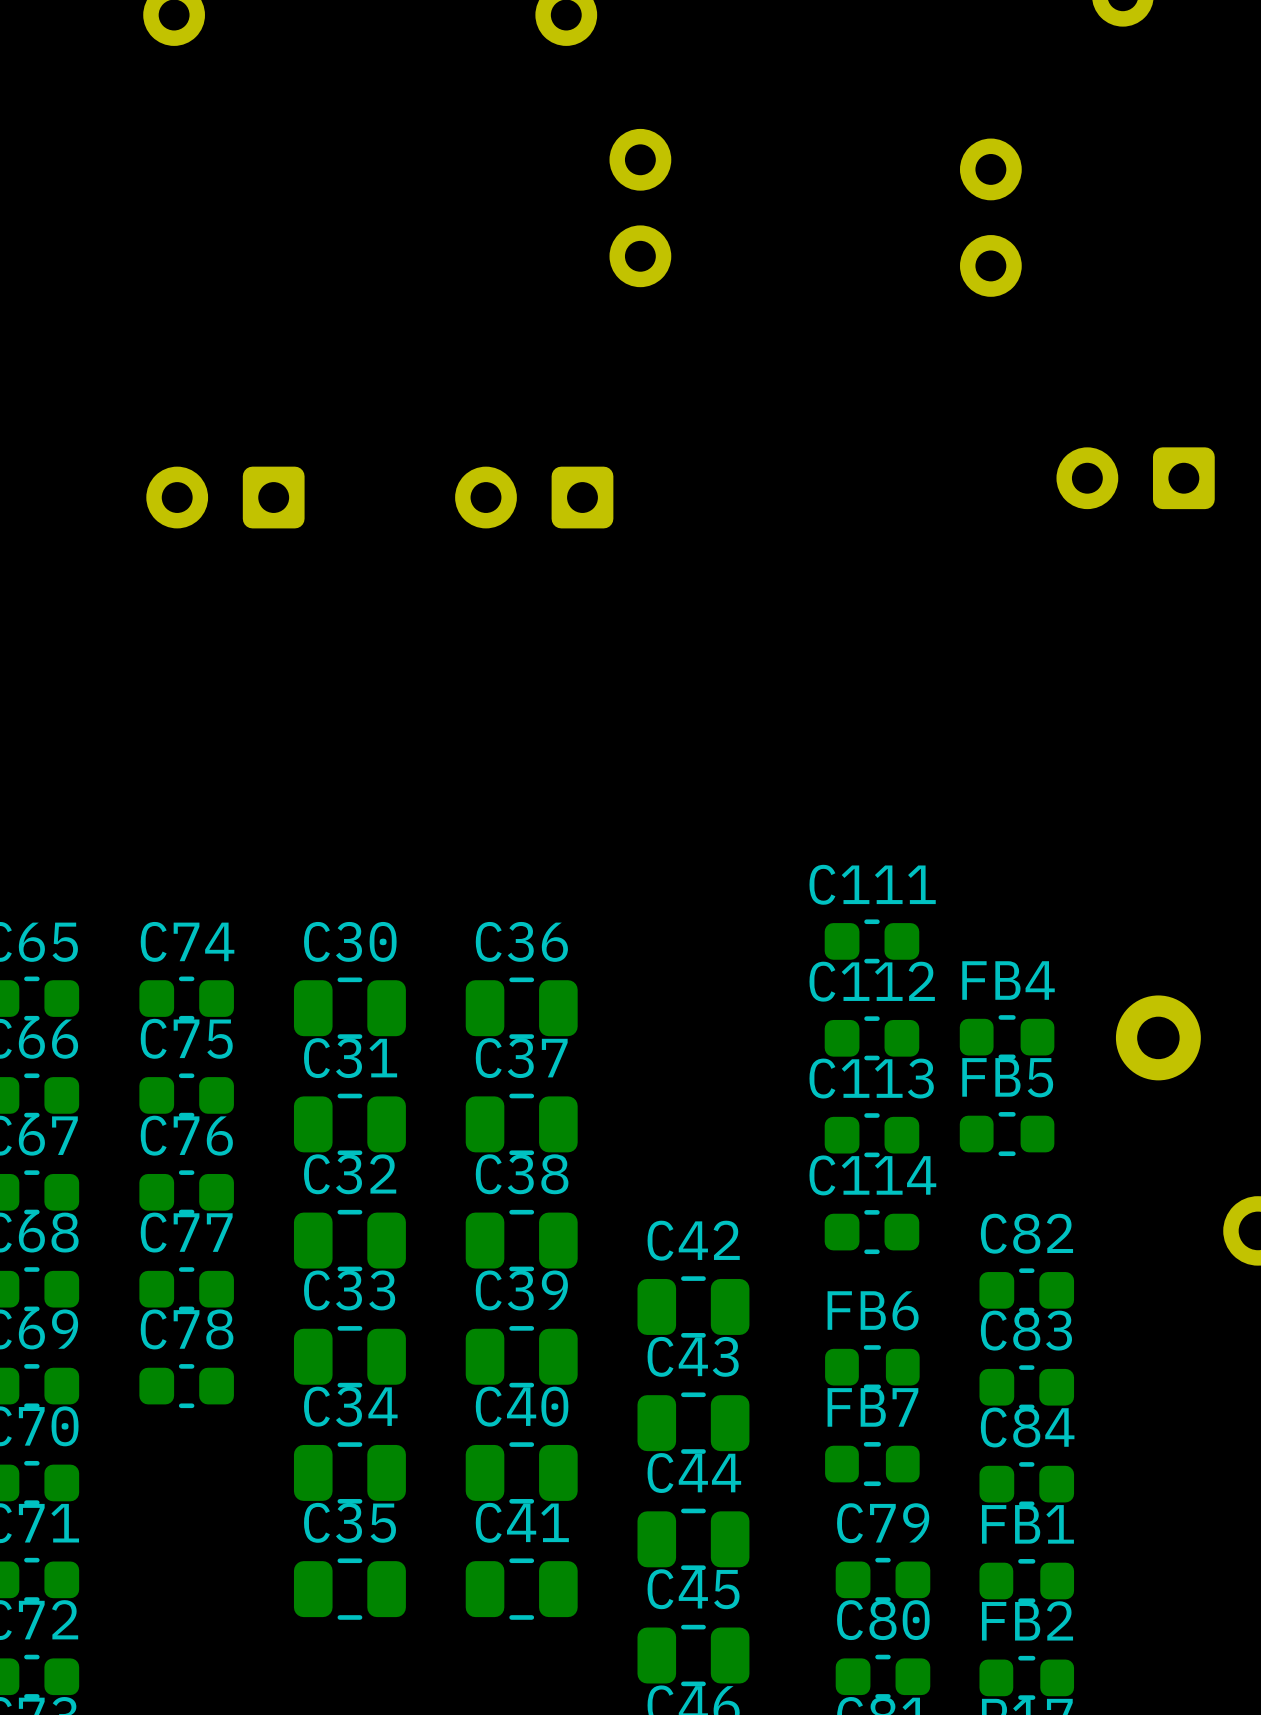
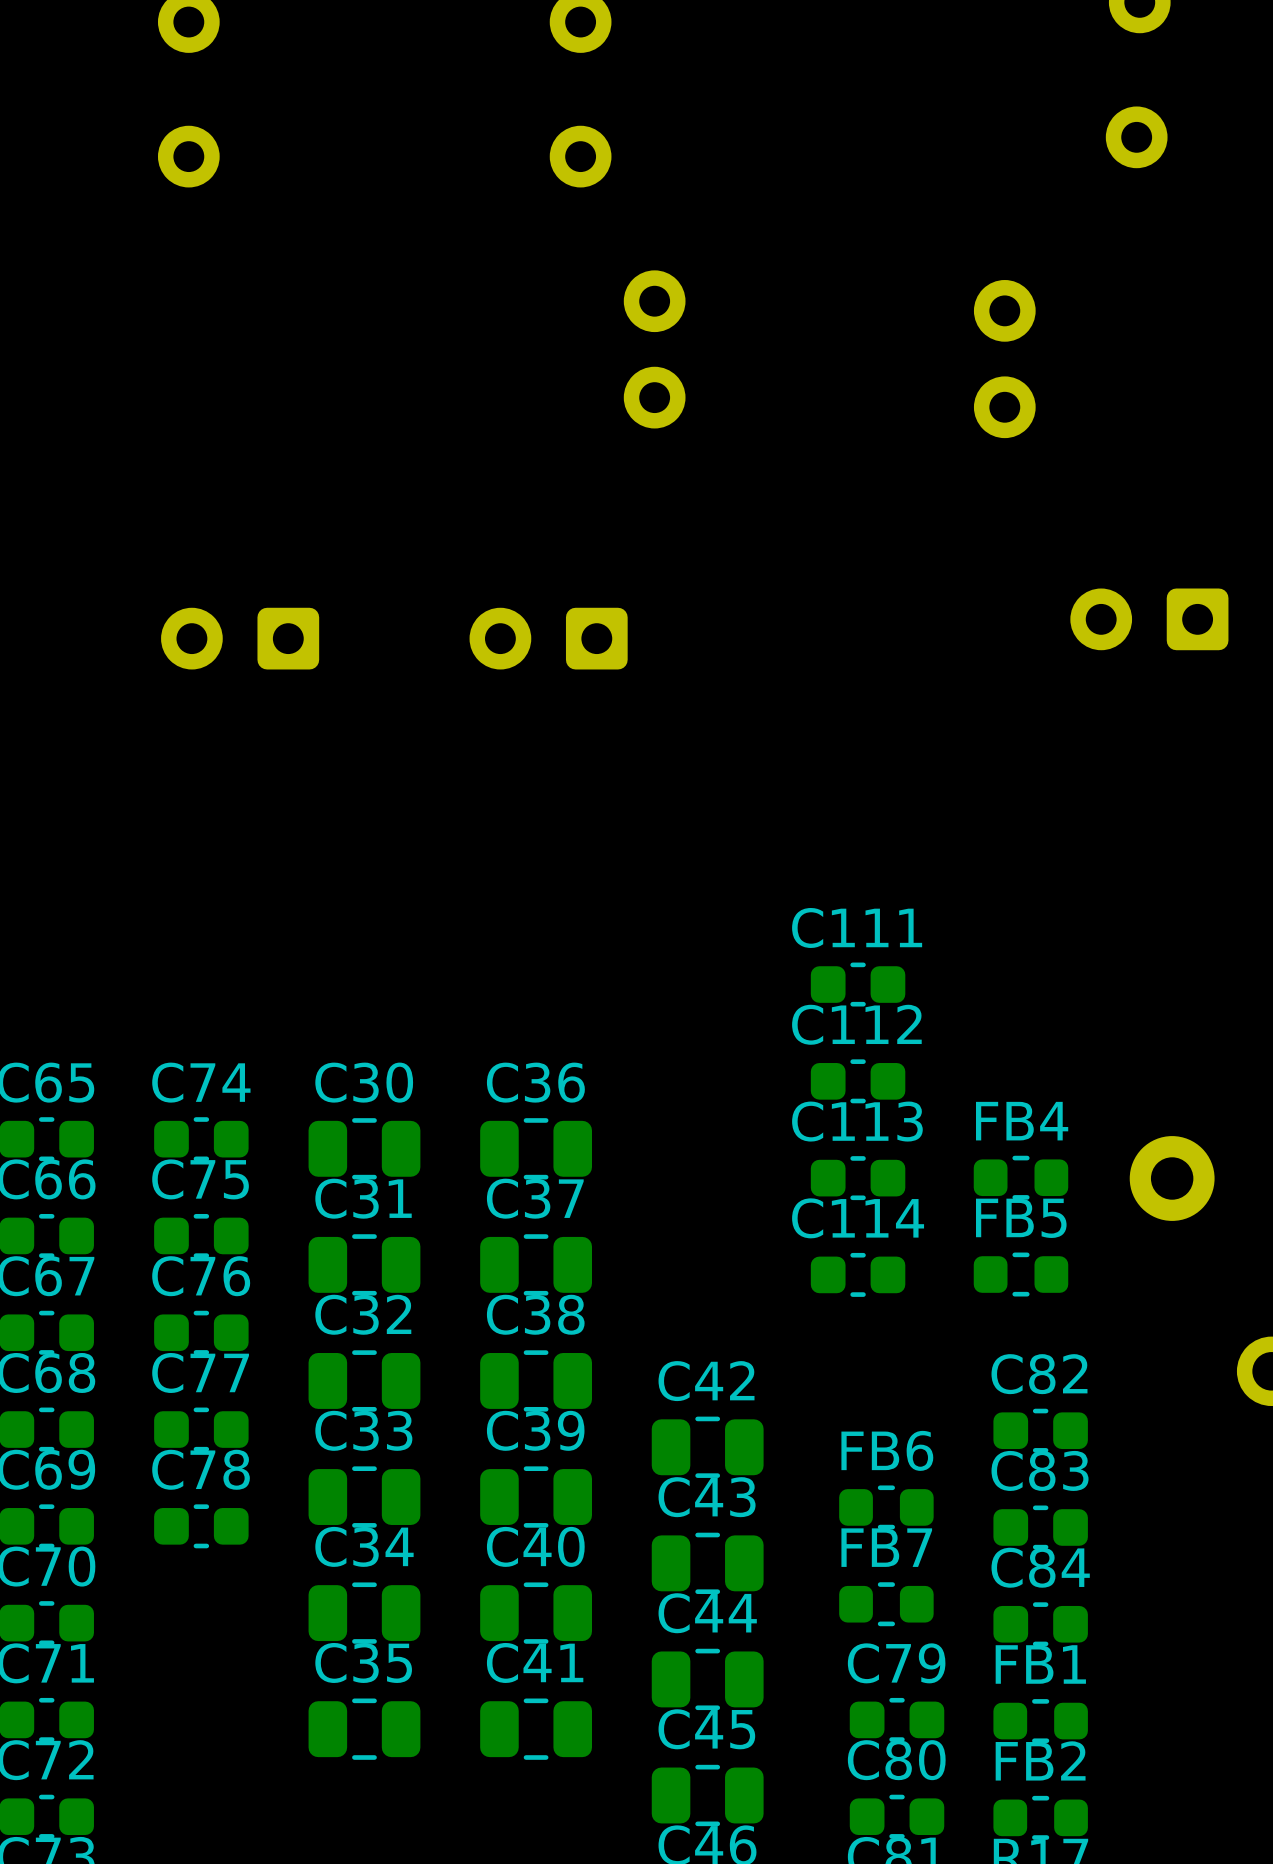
C111 position: (871, 941) -> (858, 984)
C112 position: (871, 1038) -> (858, 1081)
C113 position: (871, 1135) -> (858, 1178)
C114 position: (871, 1232) -> (858, 1274)

